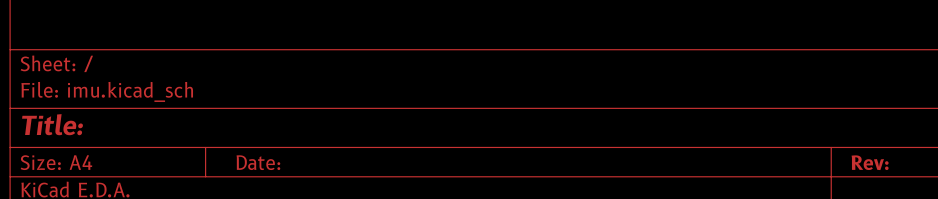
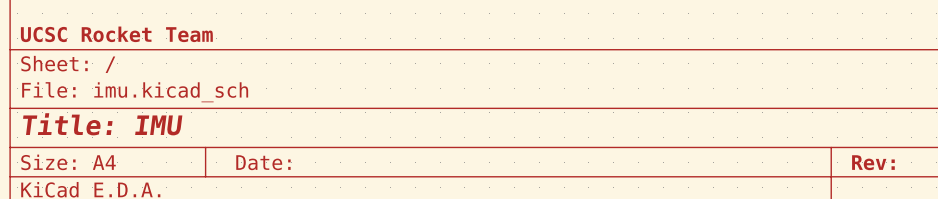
title block: none -> UCSC Rocket Team (116, 34)
title block: Title: (52, 124) -> Title: IMU (102, 124)

